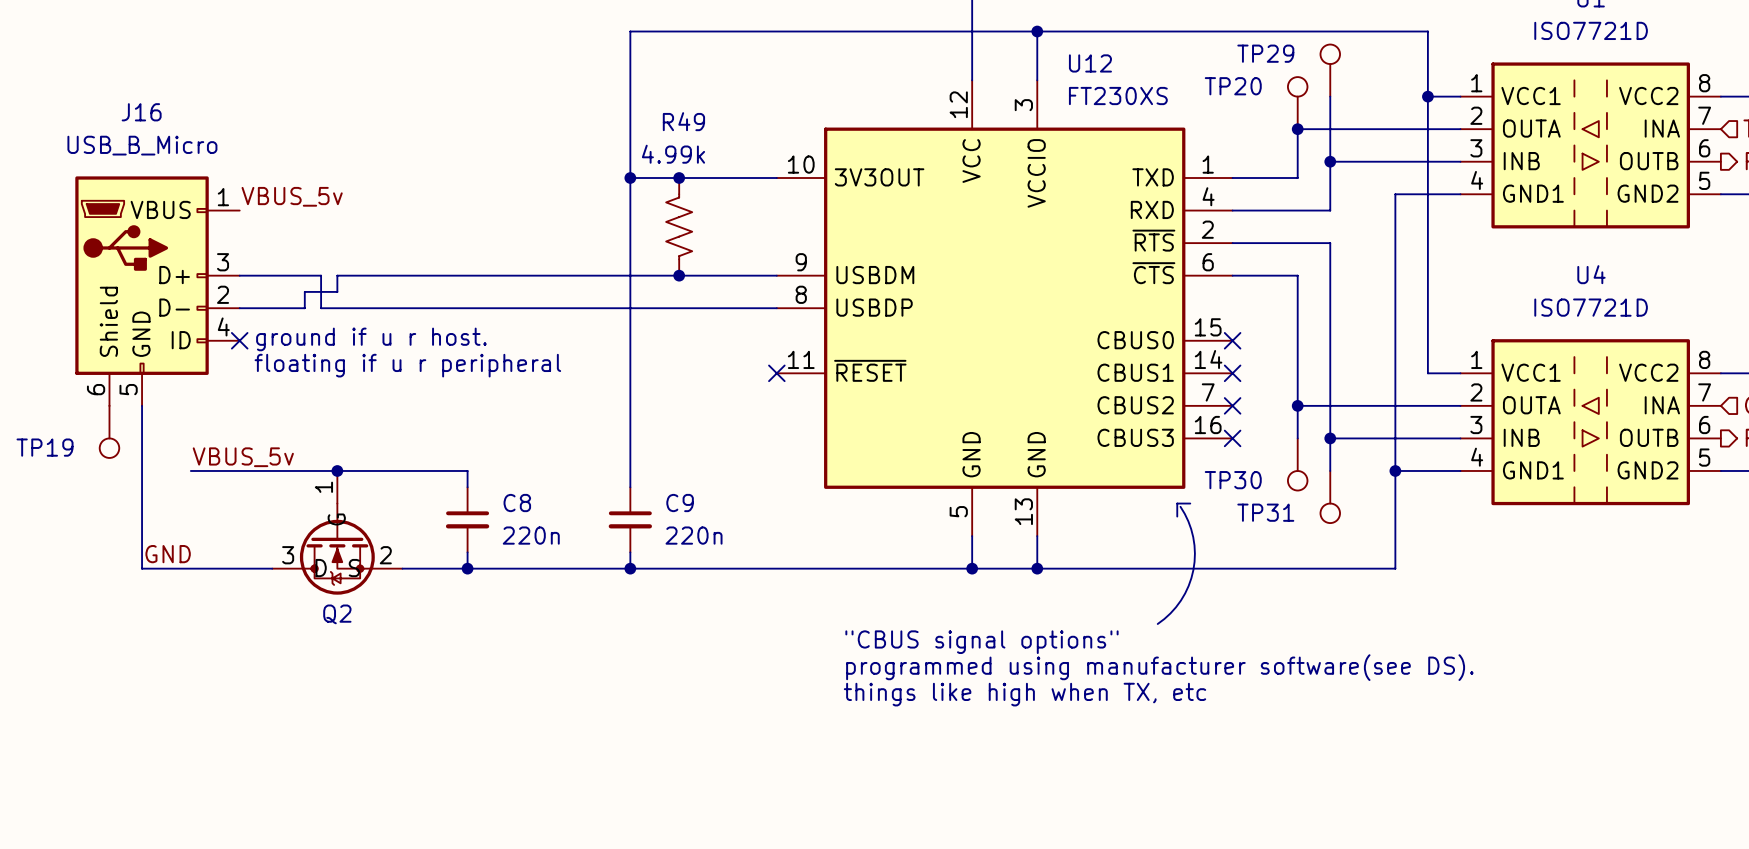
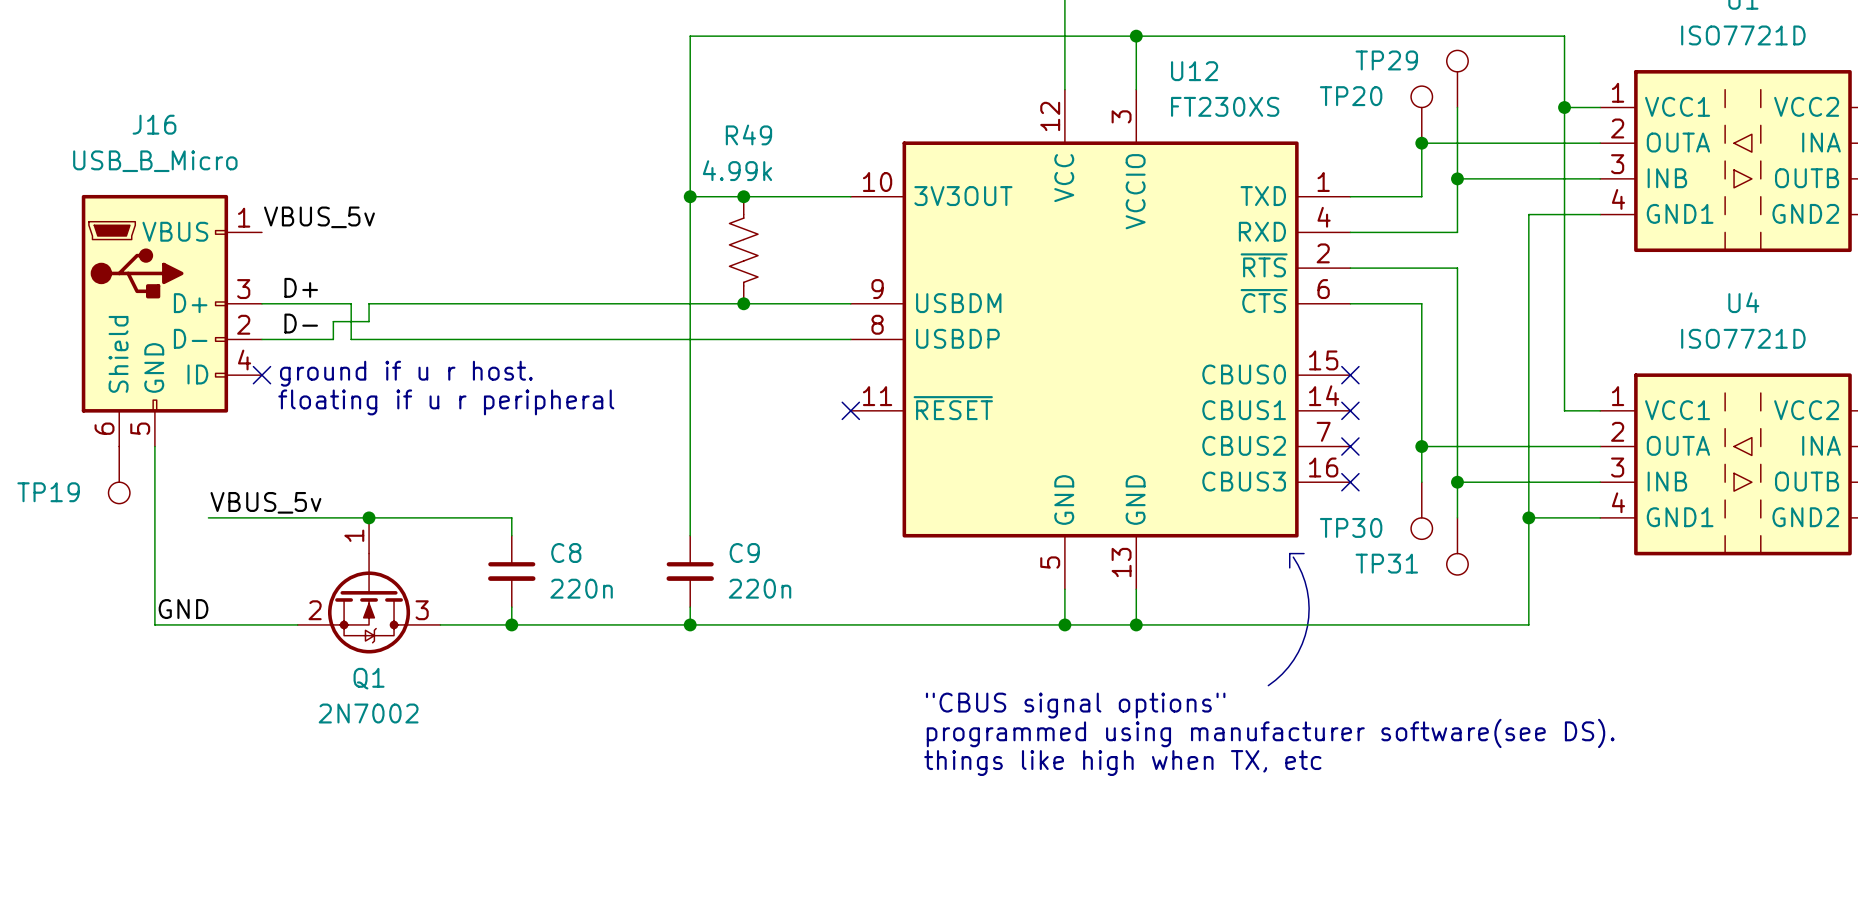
label: none -> D+ (301, 287)
label: none -> D- (301, 323)
Q2: (337, 532) -> none
Q1: none -> 2N7002 (369, 585)

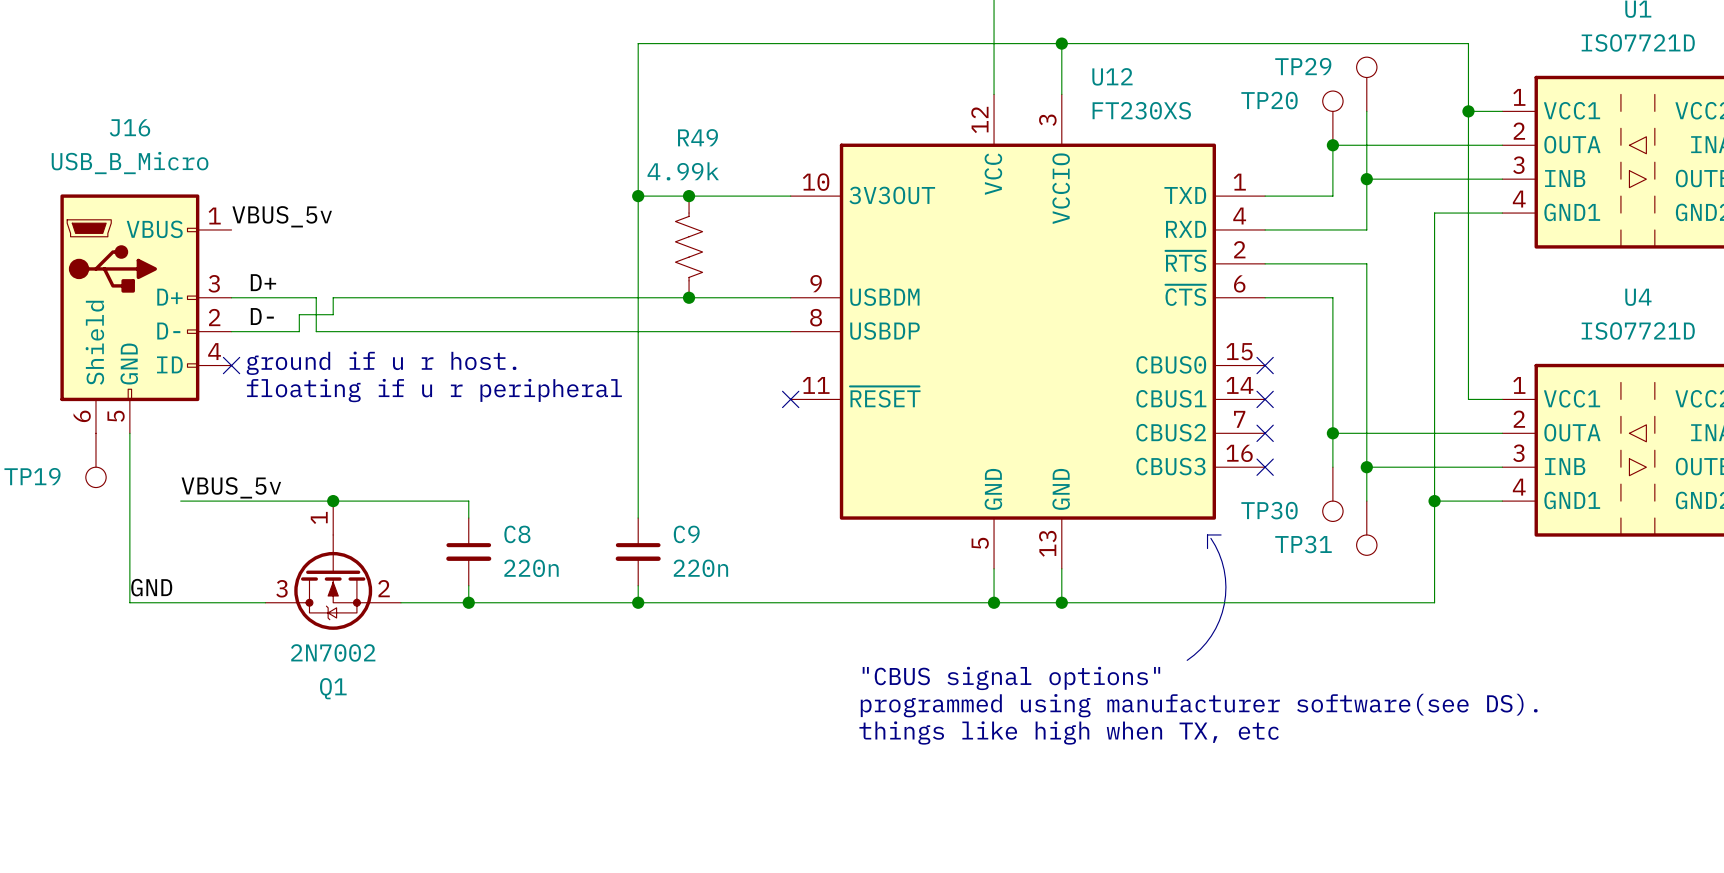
Q1 flip: as is (369, 603) -> left-right (333, 582)
Q1 name position: Q1 (369, 678) -> Q1 (333, 688)
Q1 value position: 2N7002 (368, 713) -> 2N7002 (333, 652)

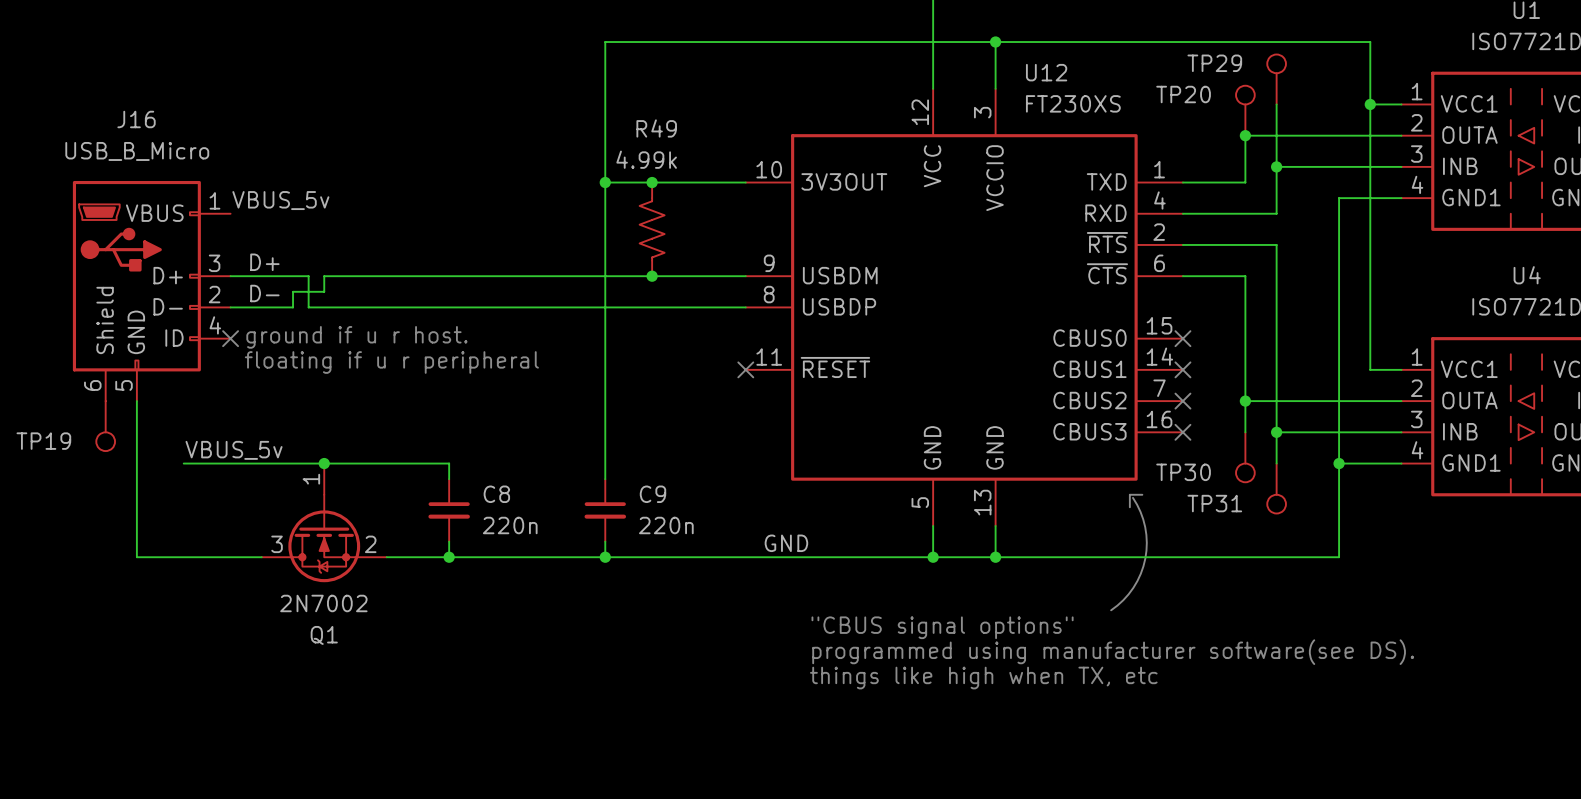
label: GND (151, 587) -> none
label: none -> GND (786, 543)

